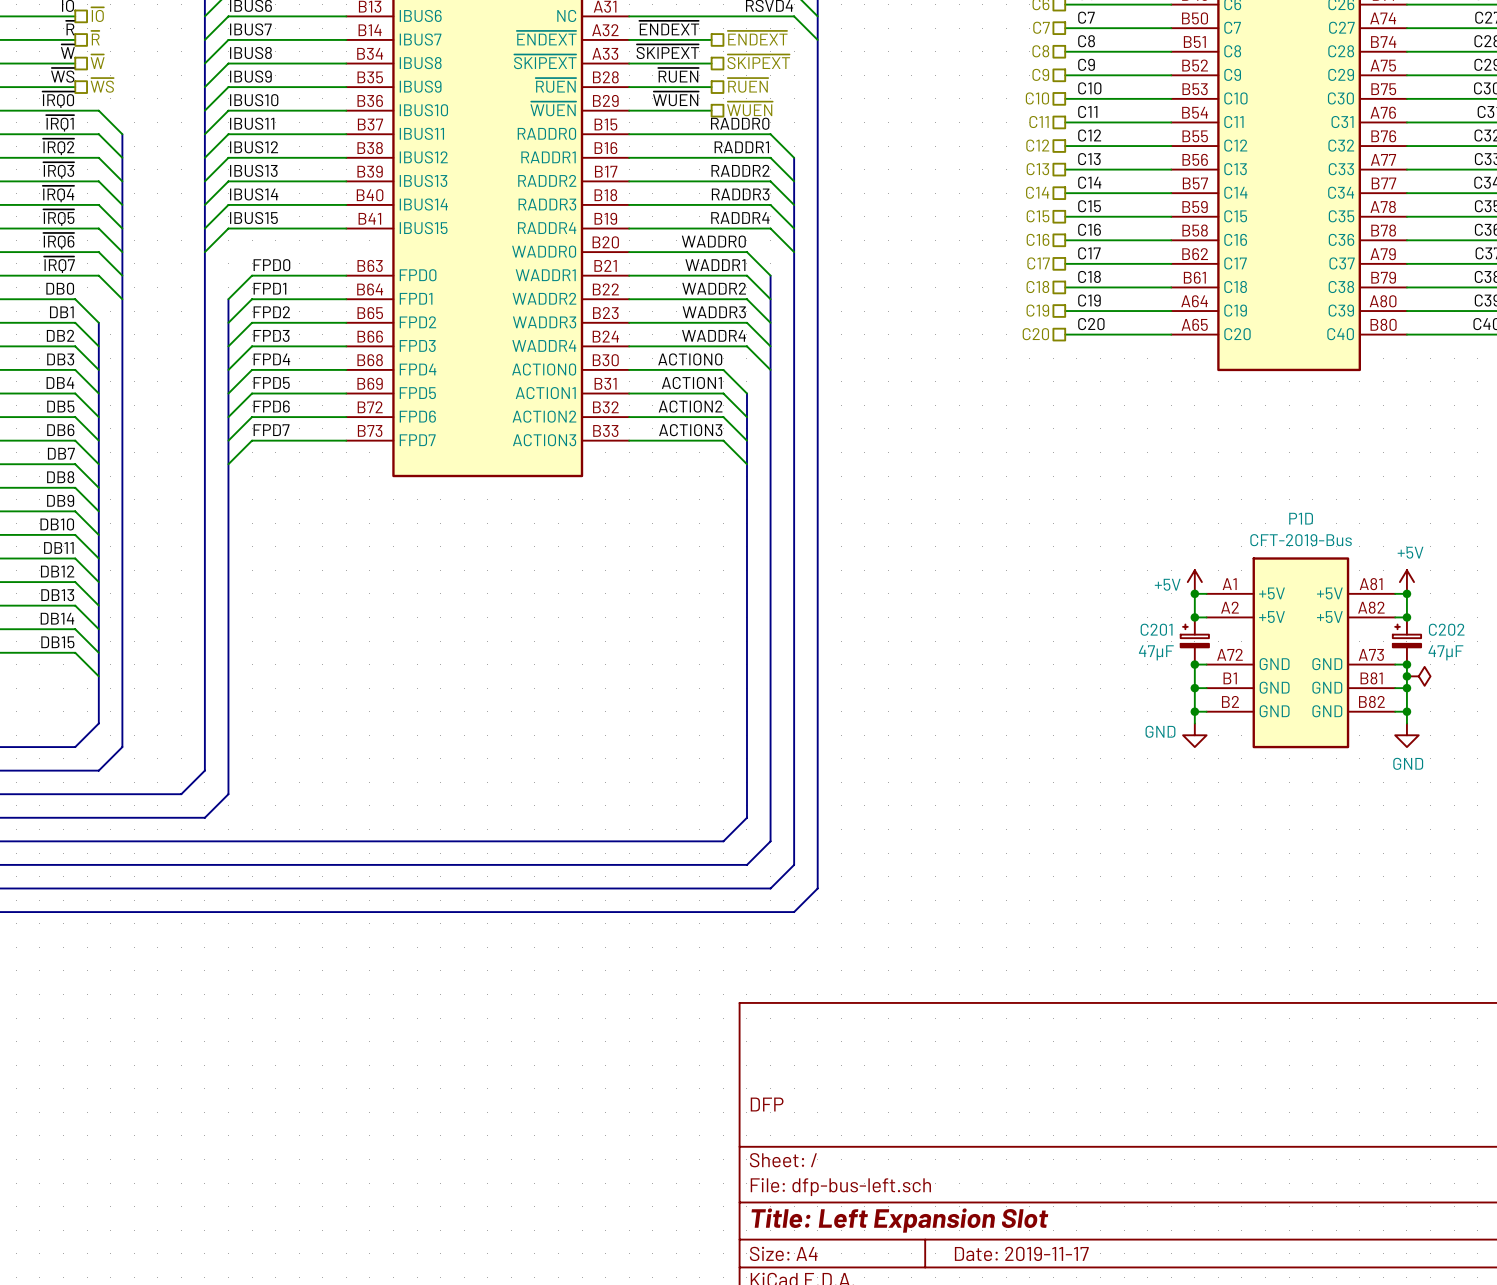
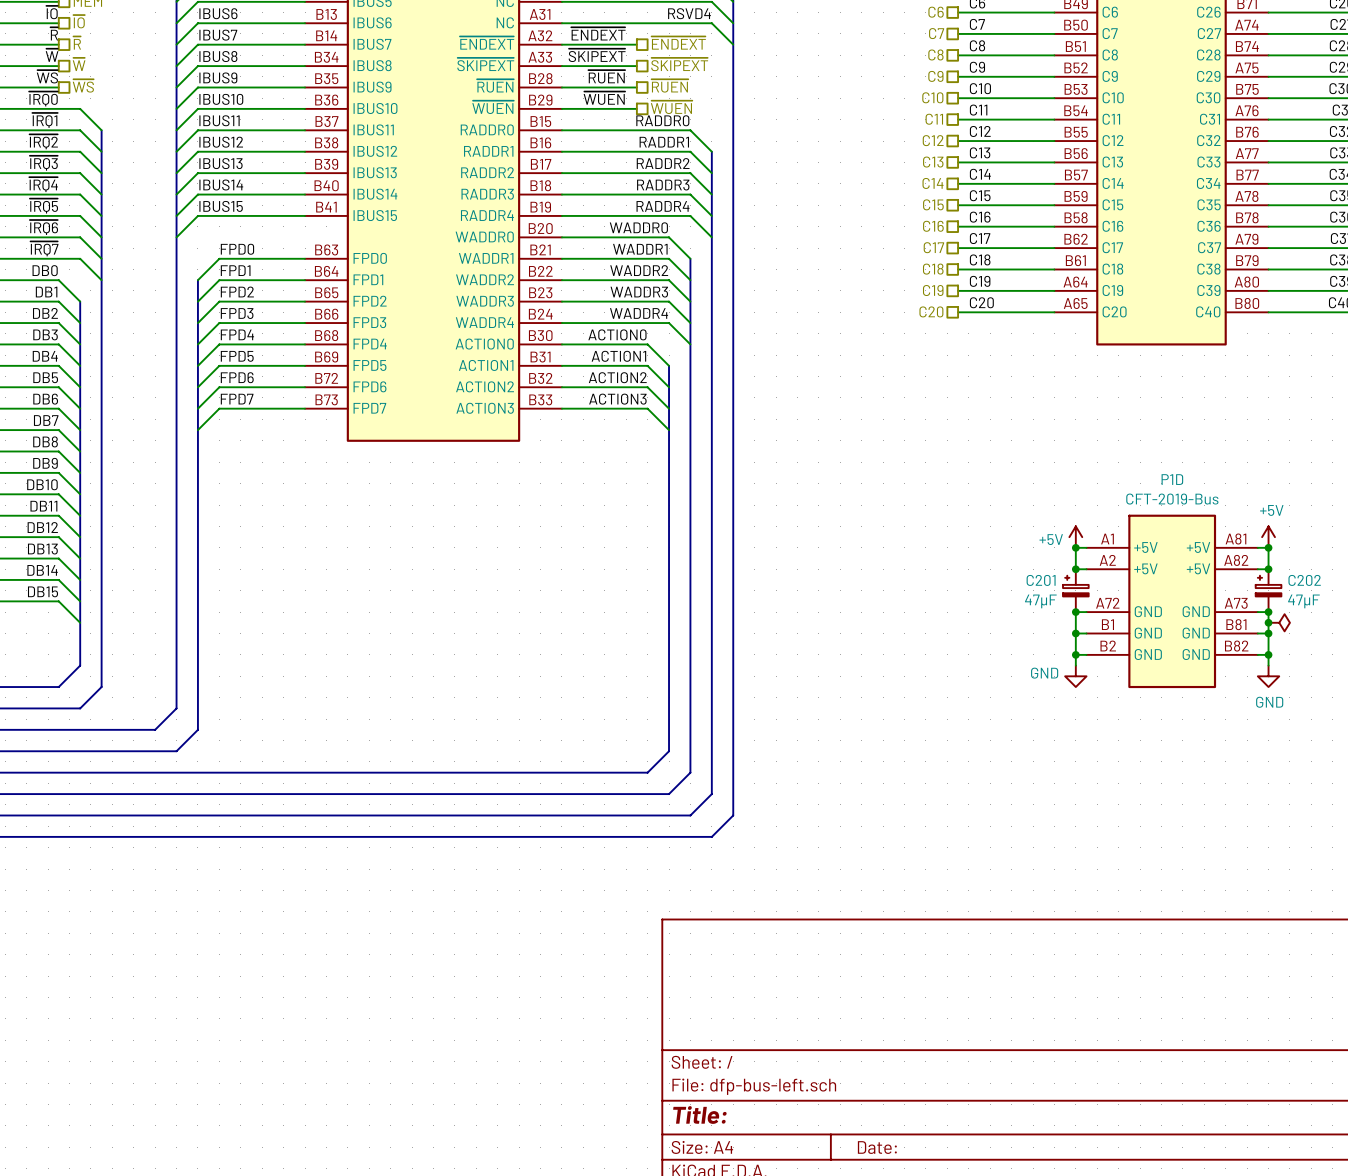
title block: DFP (767, 1104) -> none
title block: Title: Left Expansion Slot (899, 1220) -> Title: (699, 1115)
title block: Date: 2019-11-17 (1021, 1253) -> Date: (877, 1147)

